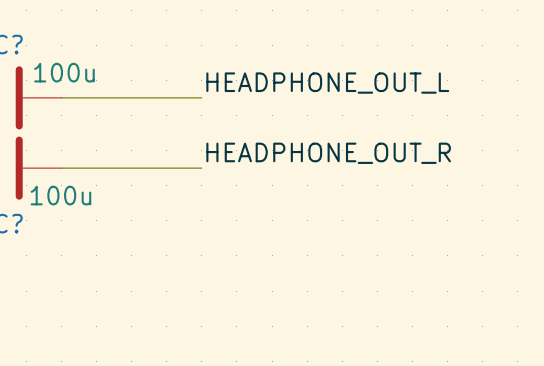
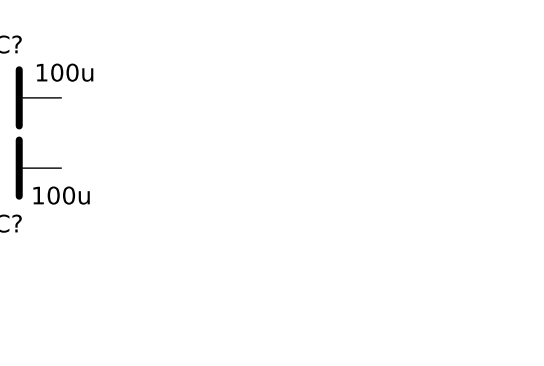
label: HEADPHONE_OUT_L (327, 83) -> none
wire: (61, 97) (201, 97) -> none
label: HEADPHONE_OUT_R (328, 153) -> none
wire: (61, 168) (201, 168) -> none

